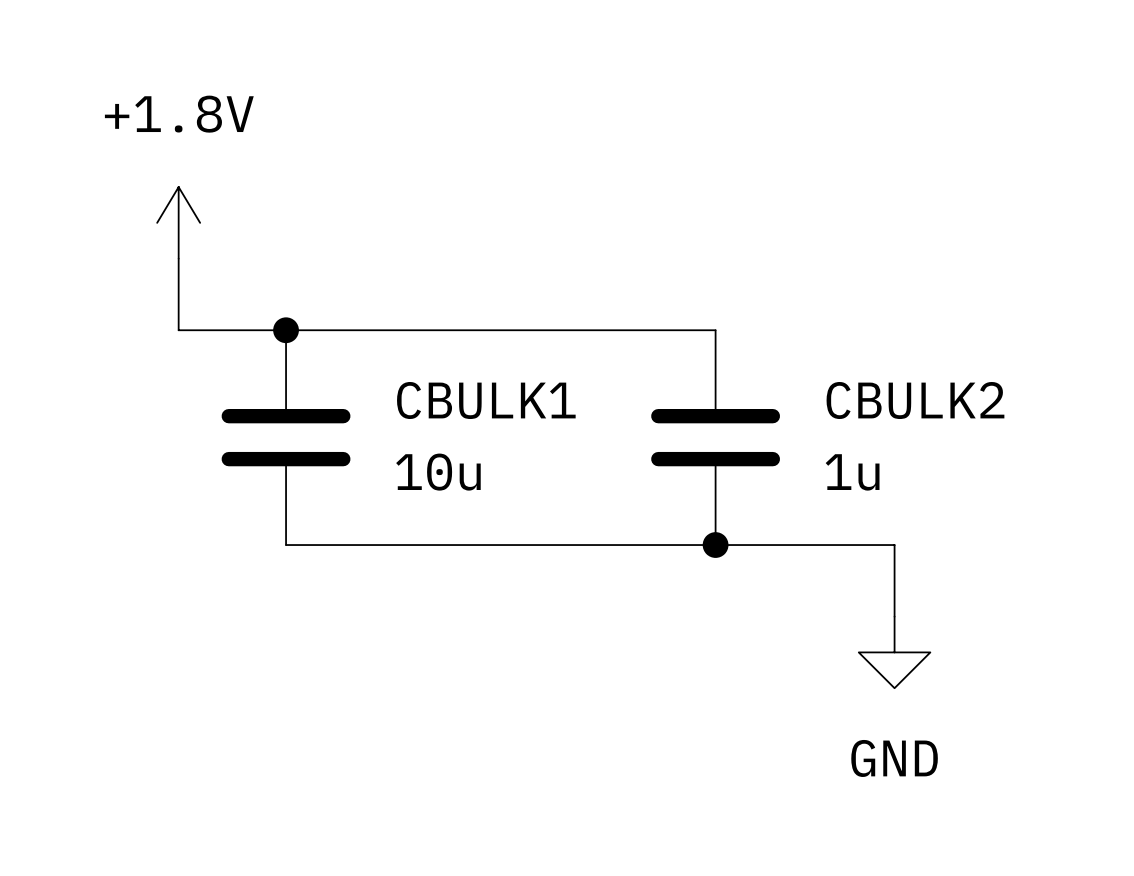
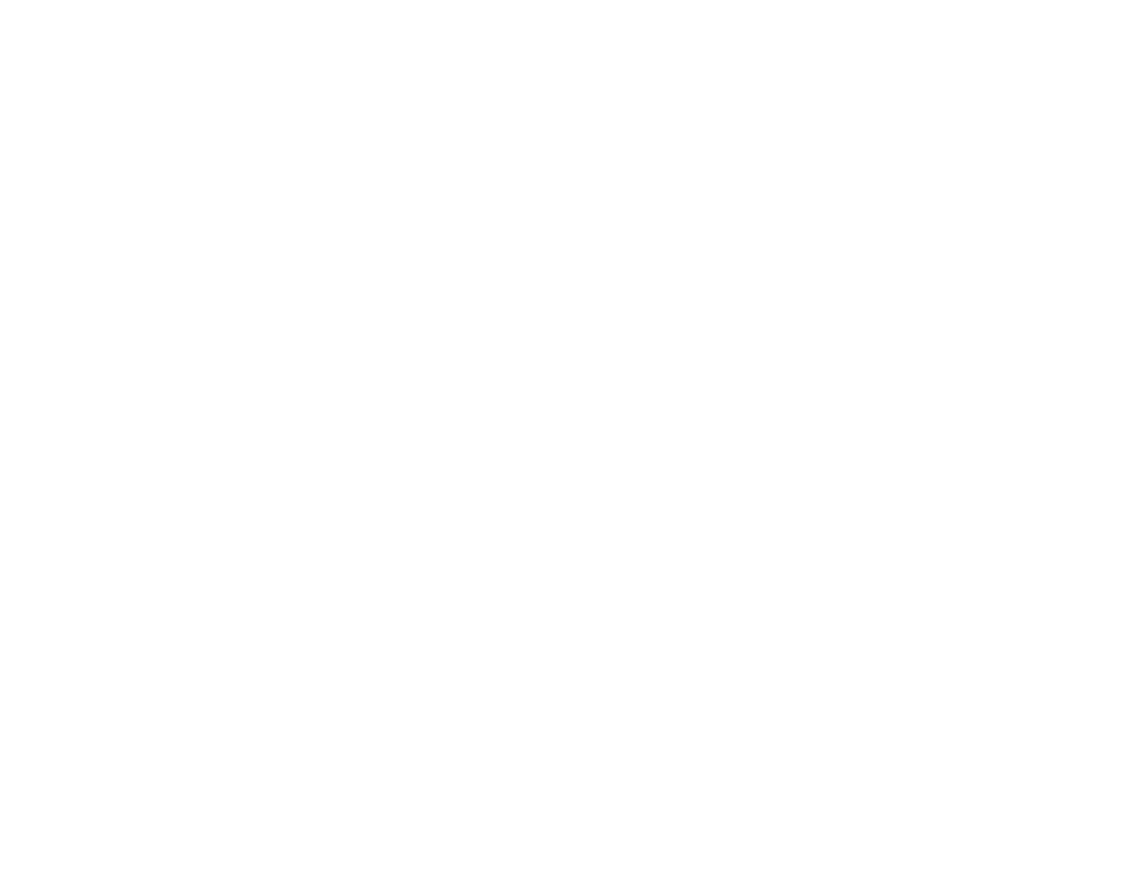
power symbol: +1.8V (178, 222) -> none
wire: (178, 258) (178, 330) (715, 330) -> none
junction: (286, 330) -> none
CBULK1: 10u (286, 437) -> none
CBULK2: 1u (715, 437) -> none
wire: (286, 545) (894, 545) (894, 616) -> none
junction: (715, 545) -> none
power symbol: GND (894, 652) -> none

